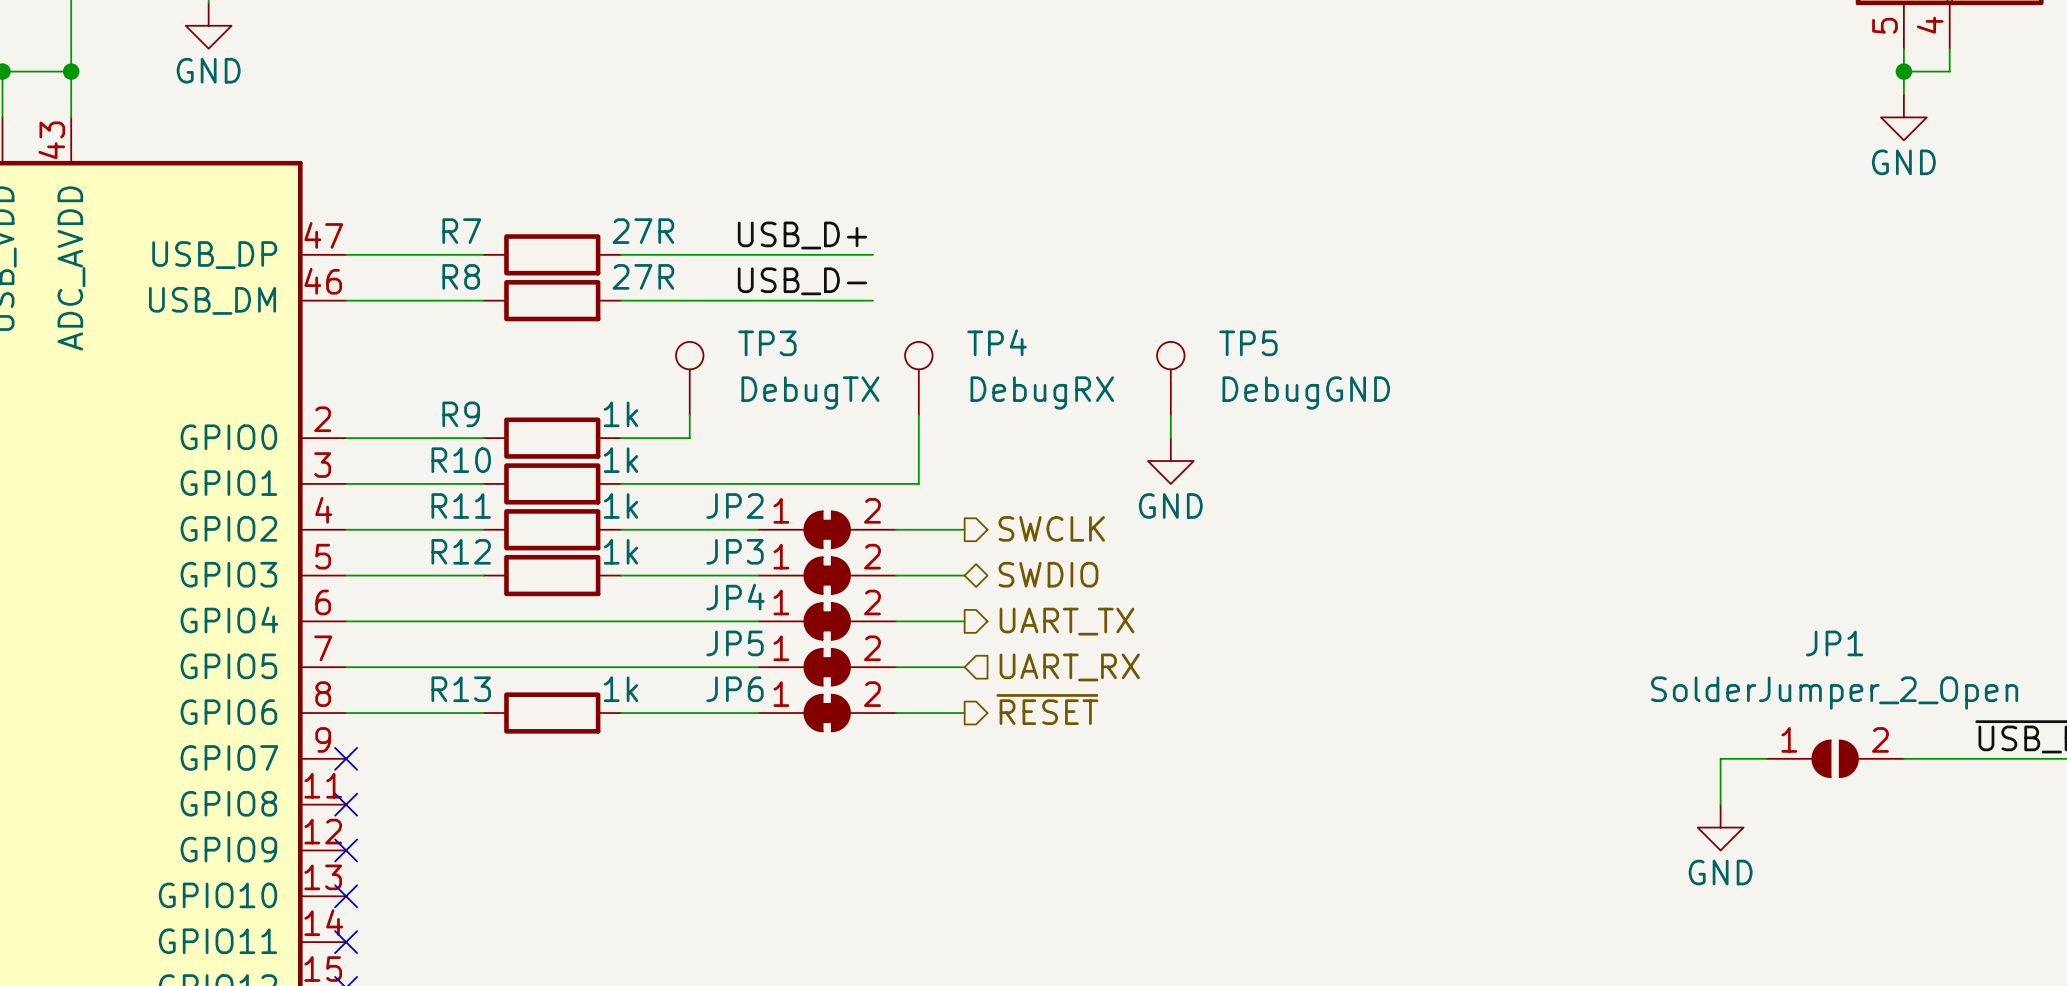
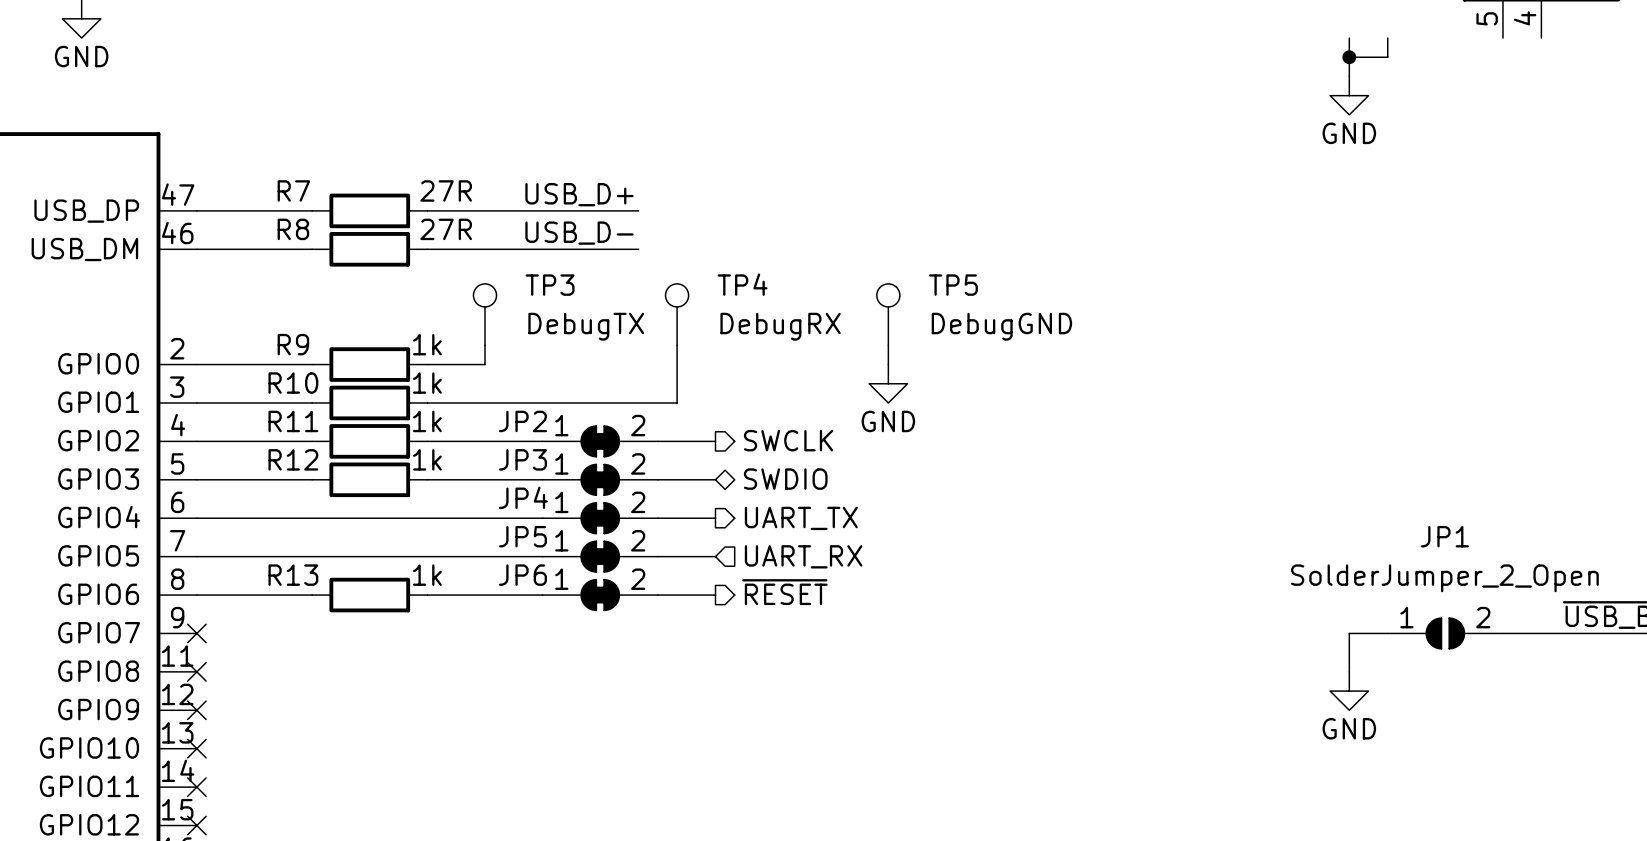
wire: (1903, 48) (1903, 94) -> (1349, 38) (1349, 76)
wire: (1949, 48) (1949, 71) (1903, 71) -> (1387, 38) (1387, 57) (1349, 57)
junction: none -> (1349, 57)
junction: (1903, 71) -> none
power symbol position: GND (1903, 117) -> GND (1349, 95)

